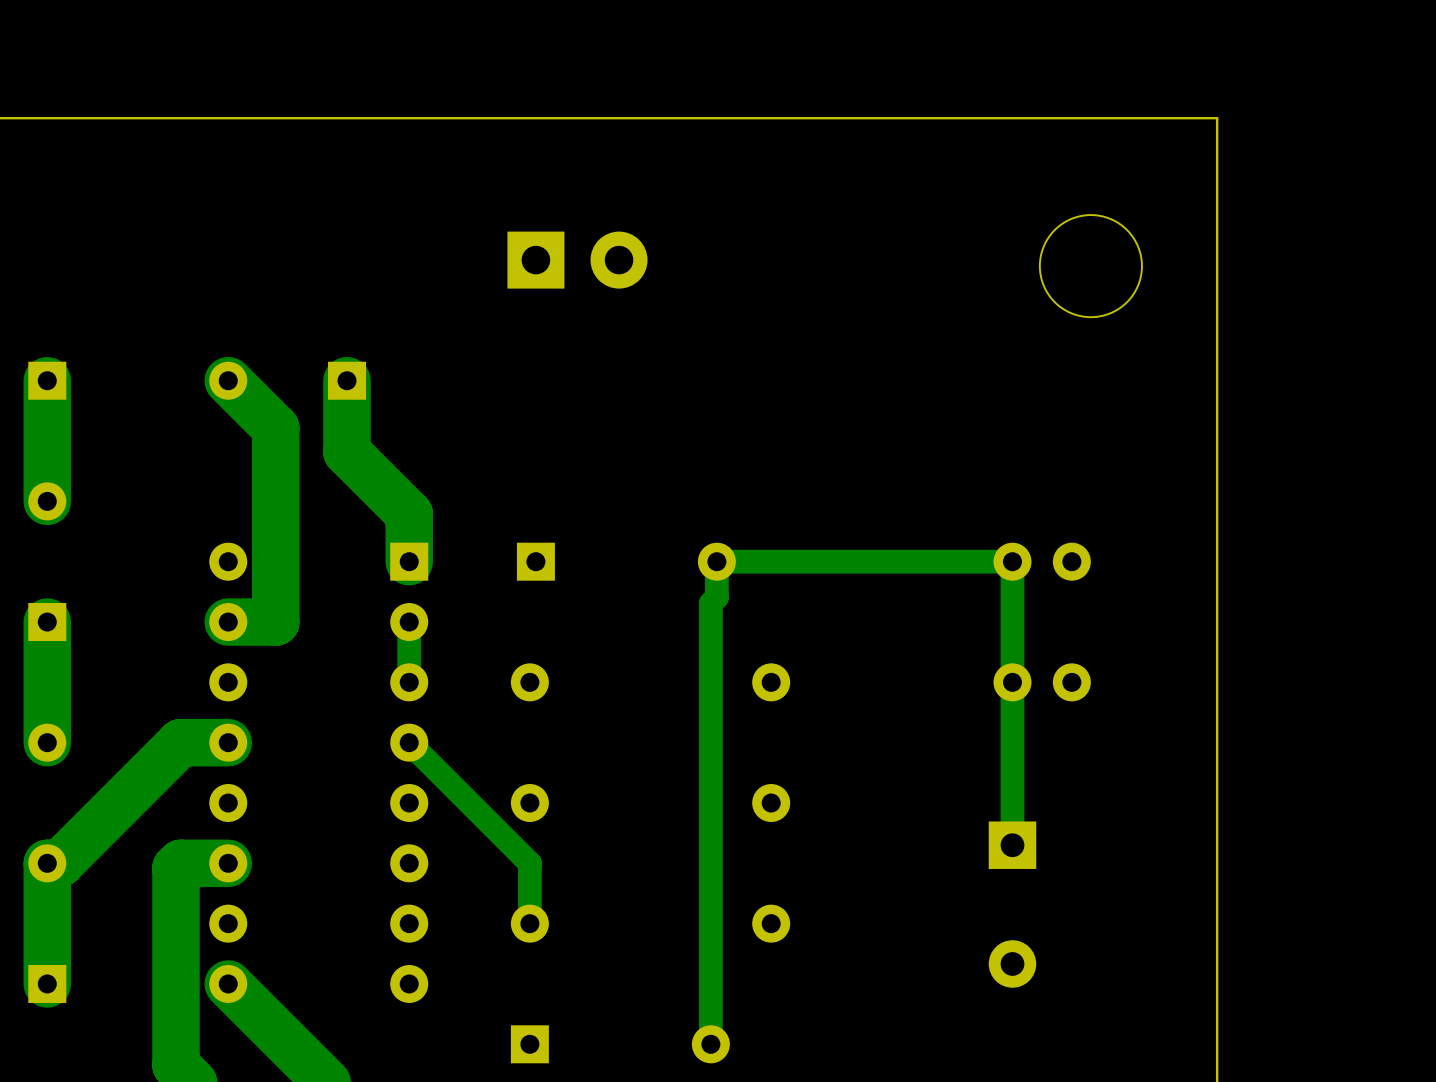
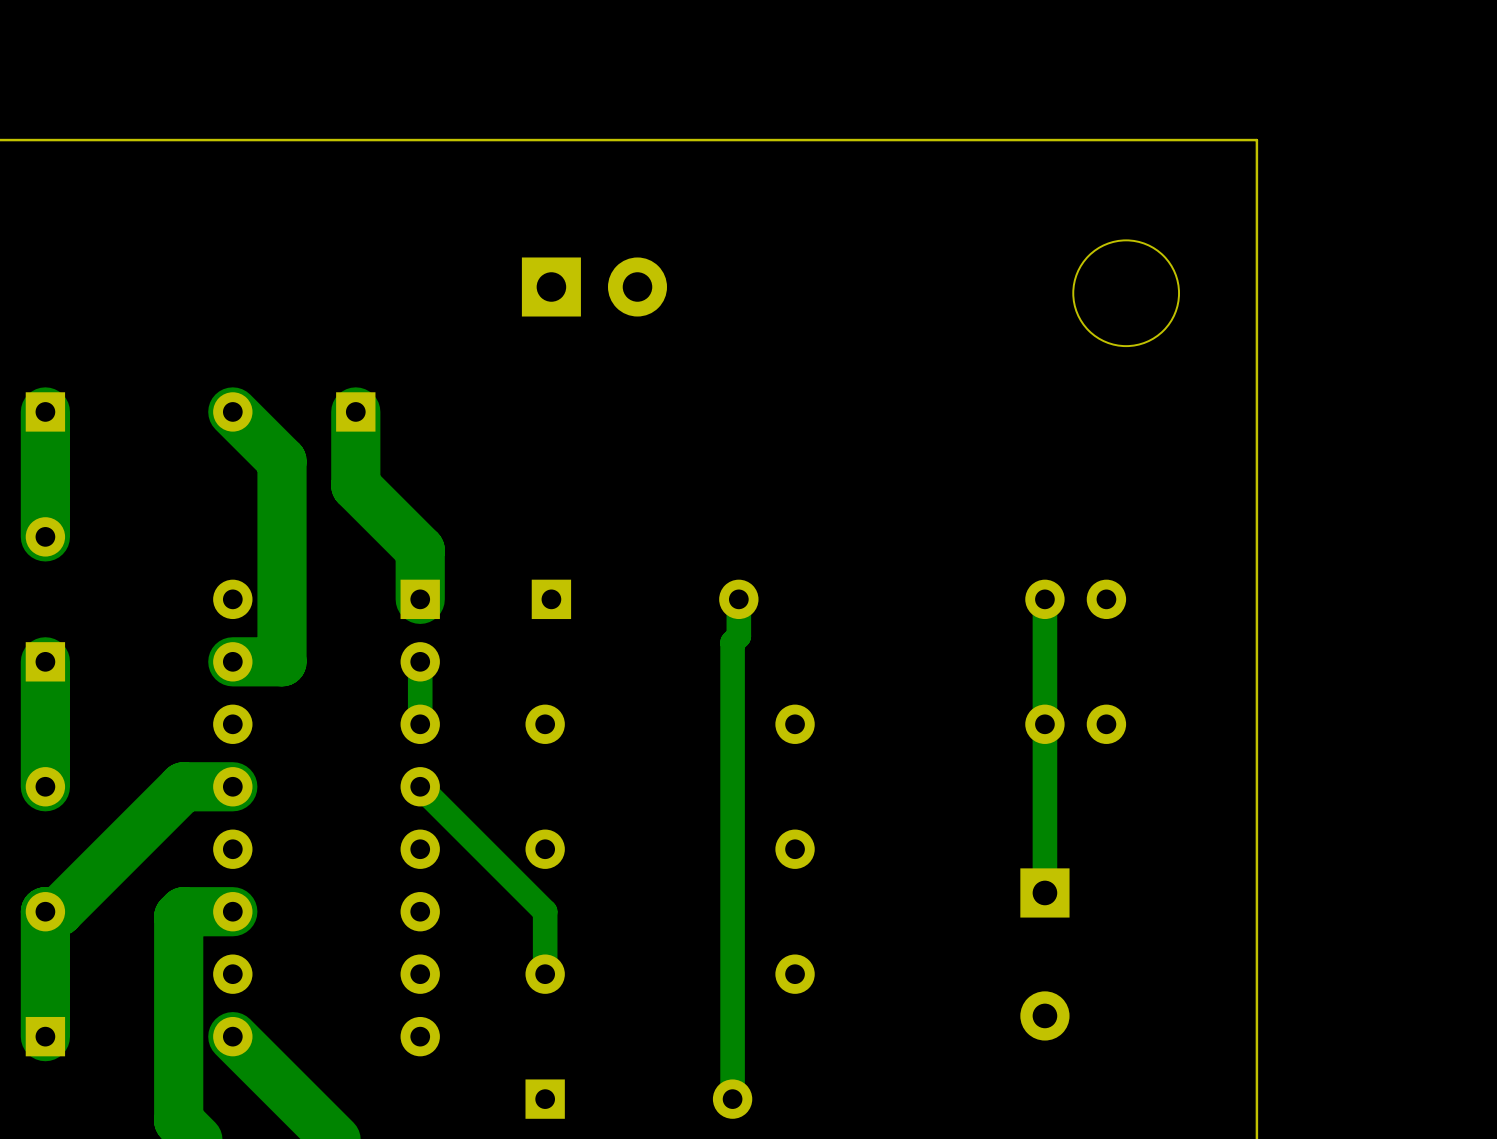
track: (1012, 561) (716, 561) -> none

